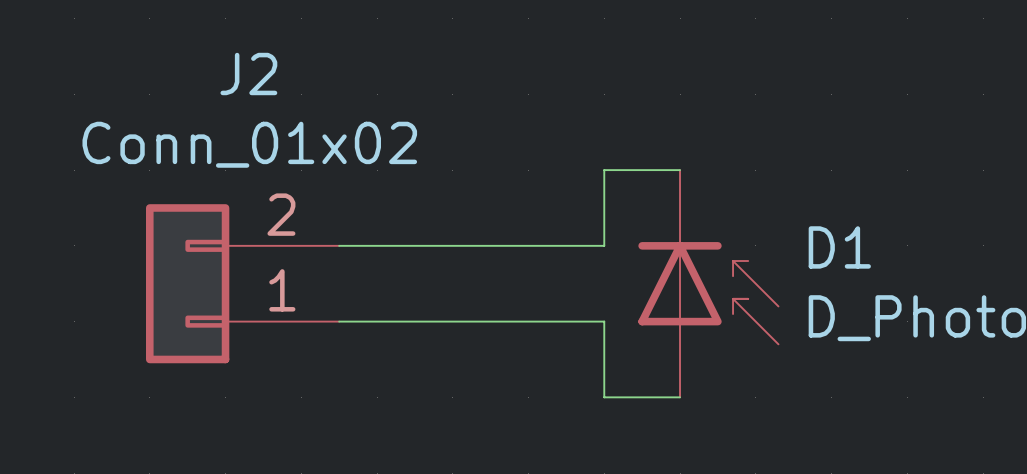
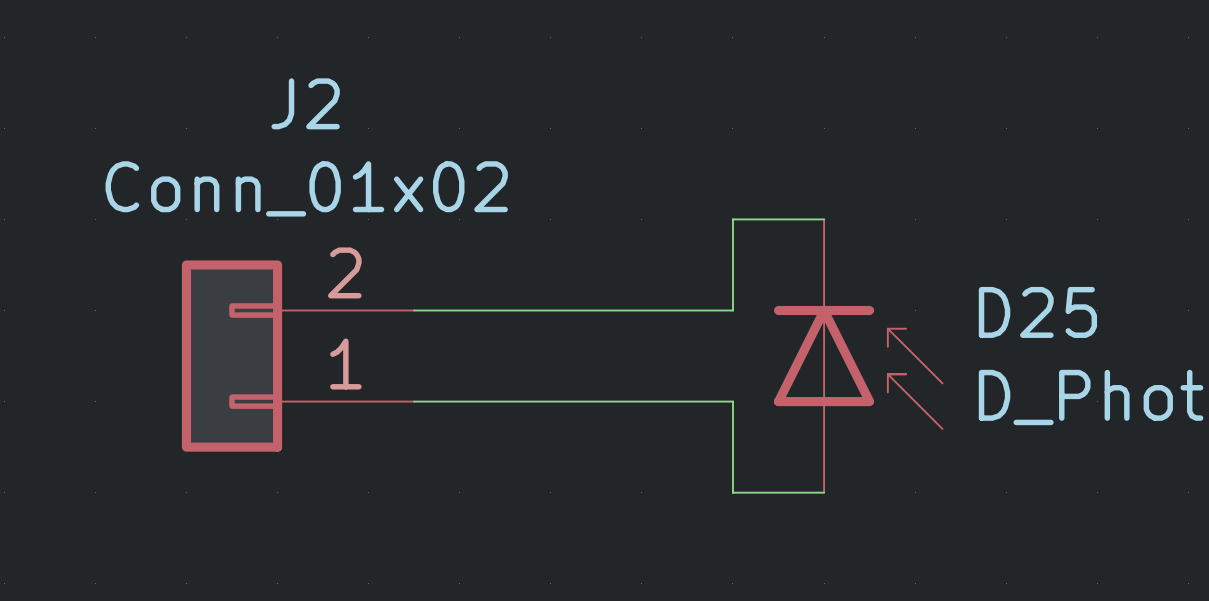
D1 name: D1 (839, 247) -> D25 (1037, 312)

